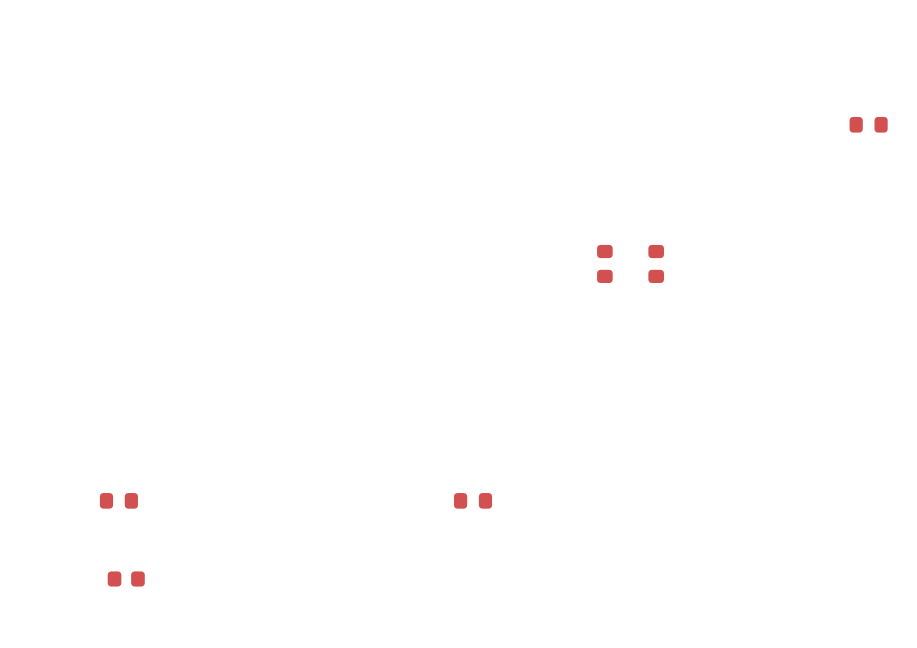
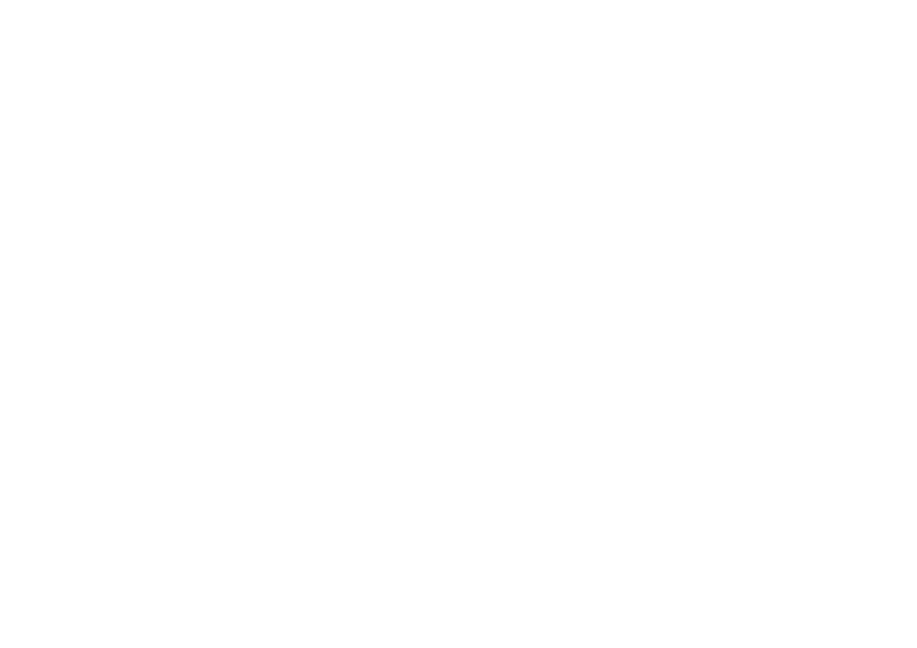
part: (868, 124) -> none
part: (604, 263) -> none
part: (656, 263) -> none
part: (118, 500) -> none
part: (473, 500) -> none
part: (126, 578) -> none

